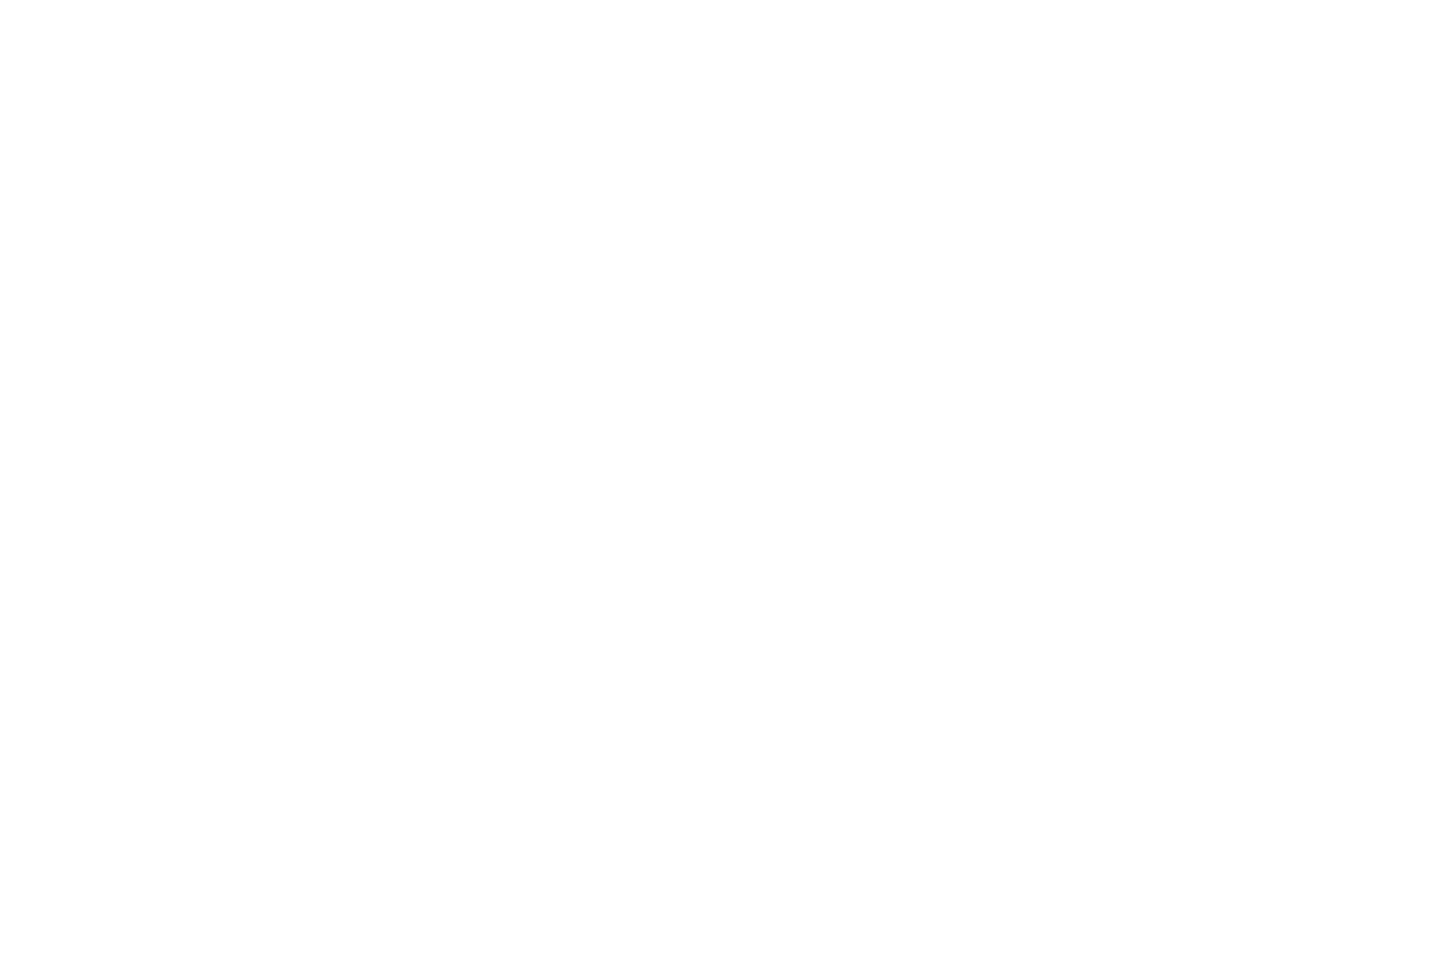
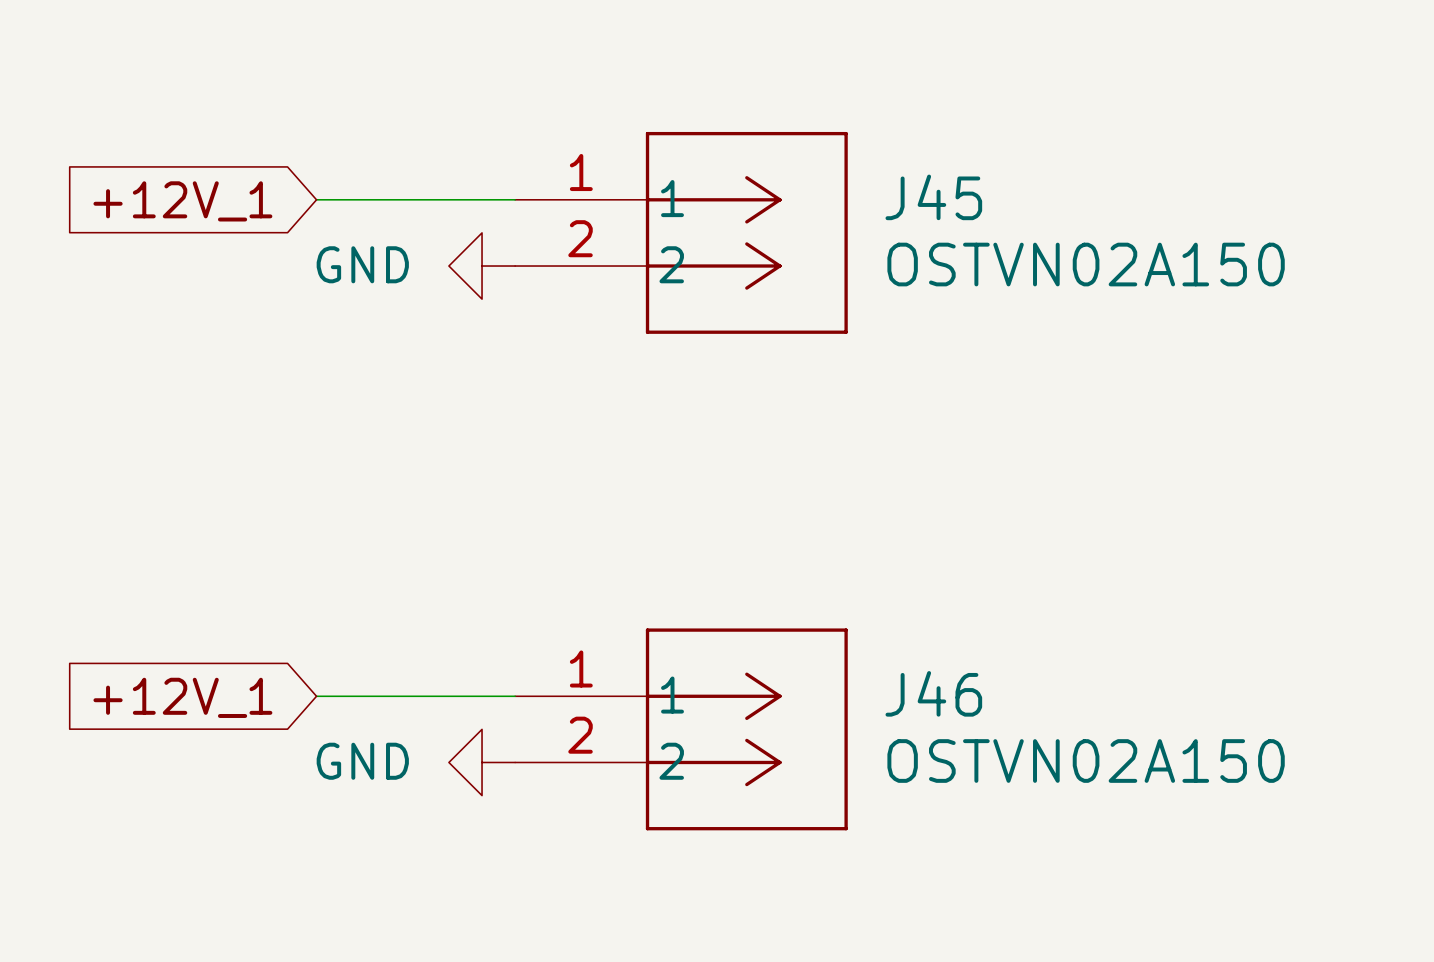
wire: none -> (316, 199) (515, 199)
global label: none -> +12V_1 (182, 201)
J45: none -> OSTVN02A150 (681, 232)
power symbol: none -> GND (482, 266)
wire: none -> (316, 696) (515, 696)
global label: none -> +12V_1 (182, 697)
J46: none -> OSTVN02A150 (681, 729)
power symbol: none -> GND (482, 762)

